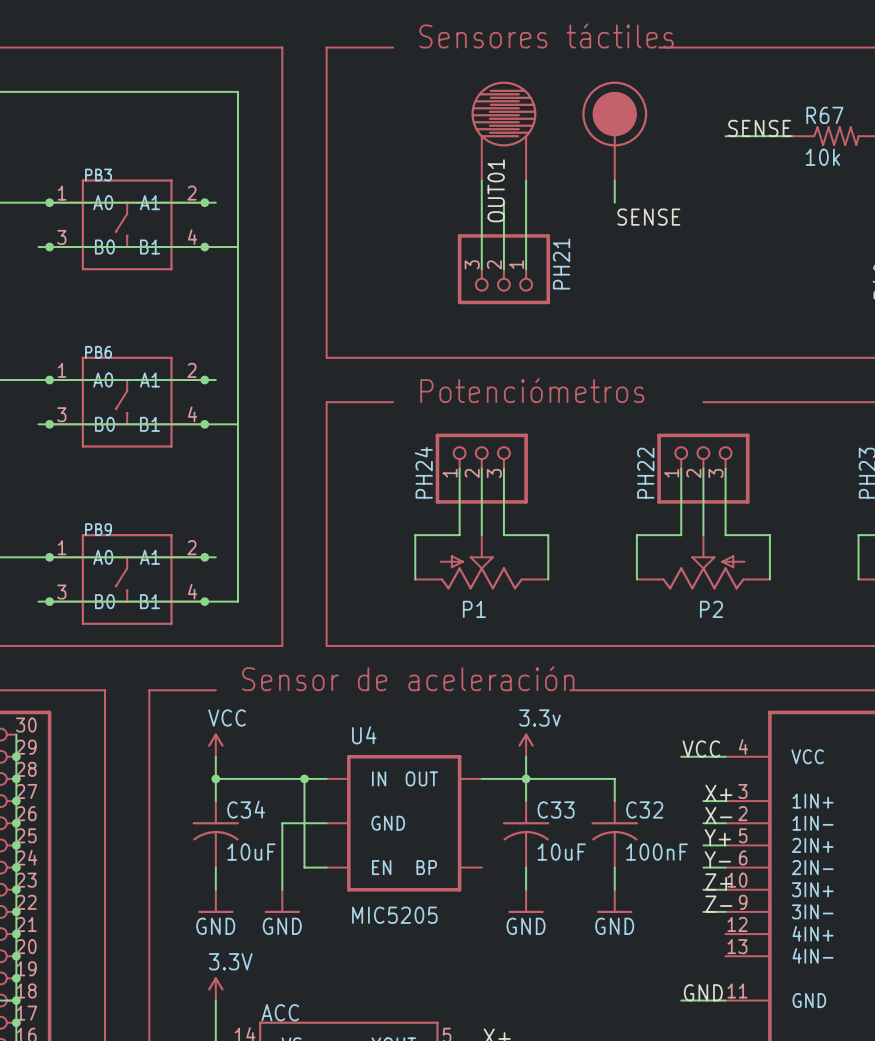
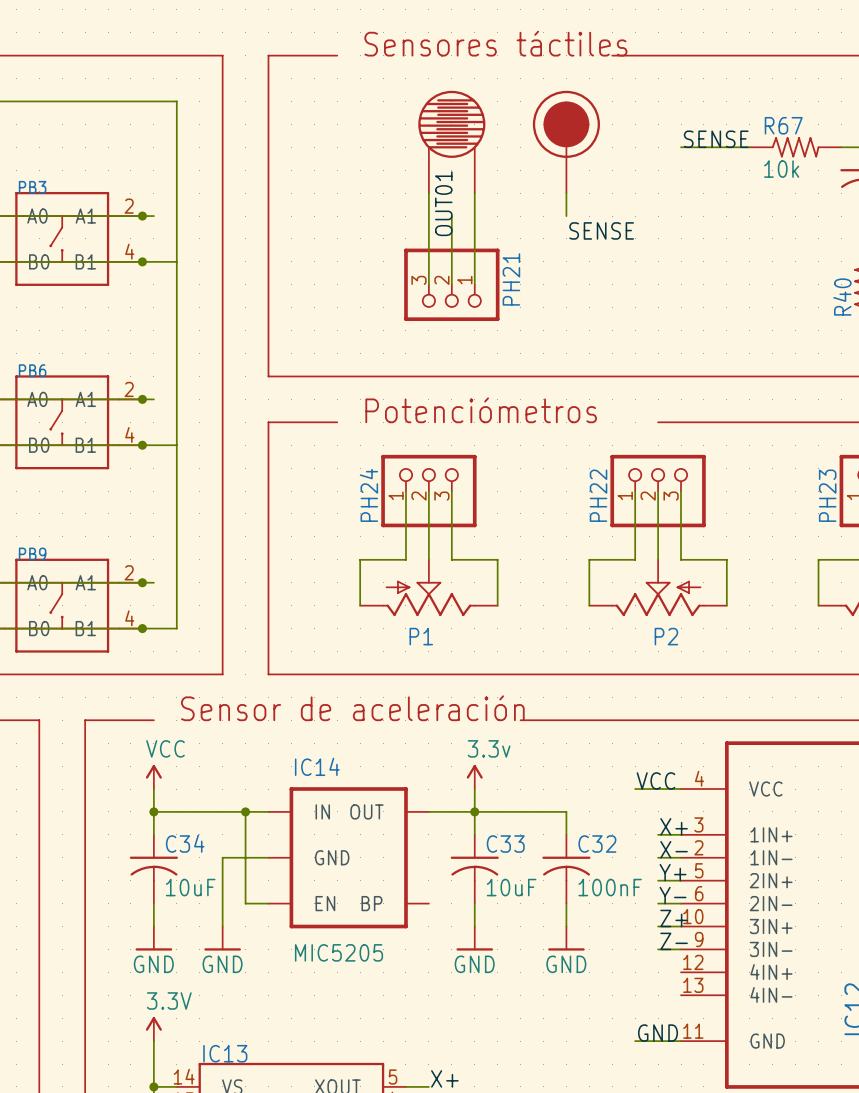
U4 name: U4 (364, 735) -> IC14 (317, 766)
ACC name: ACC (280, 1012) -> IC13 (225, 1053)

